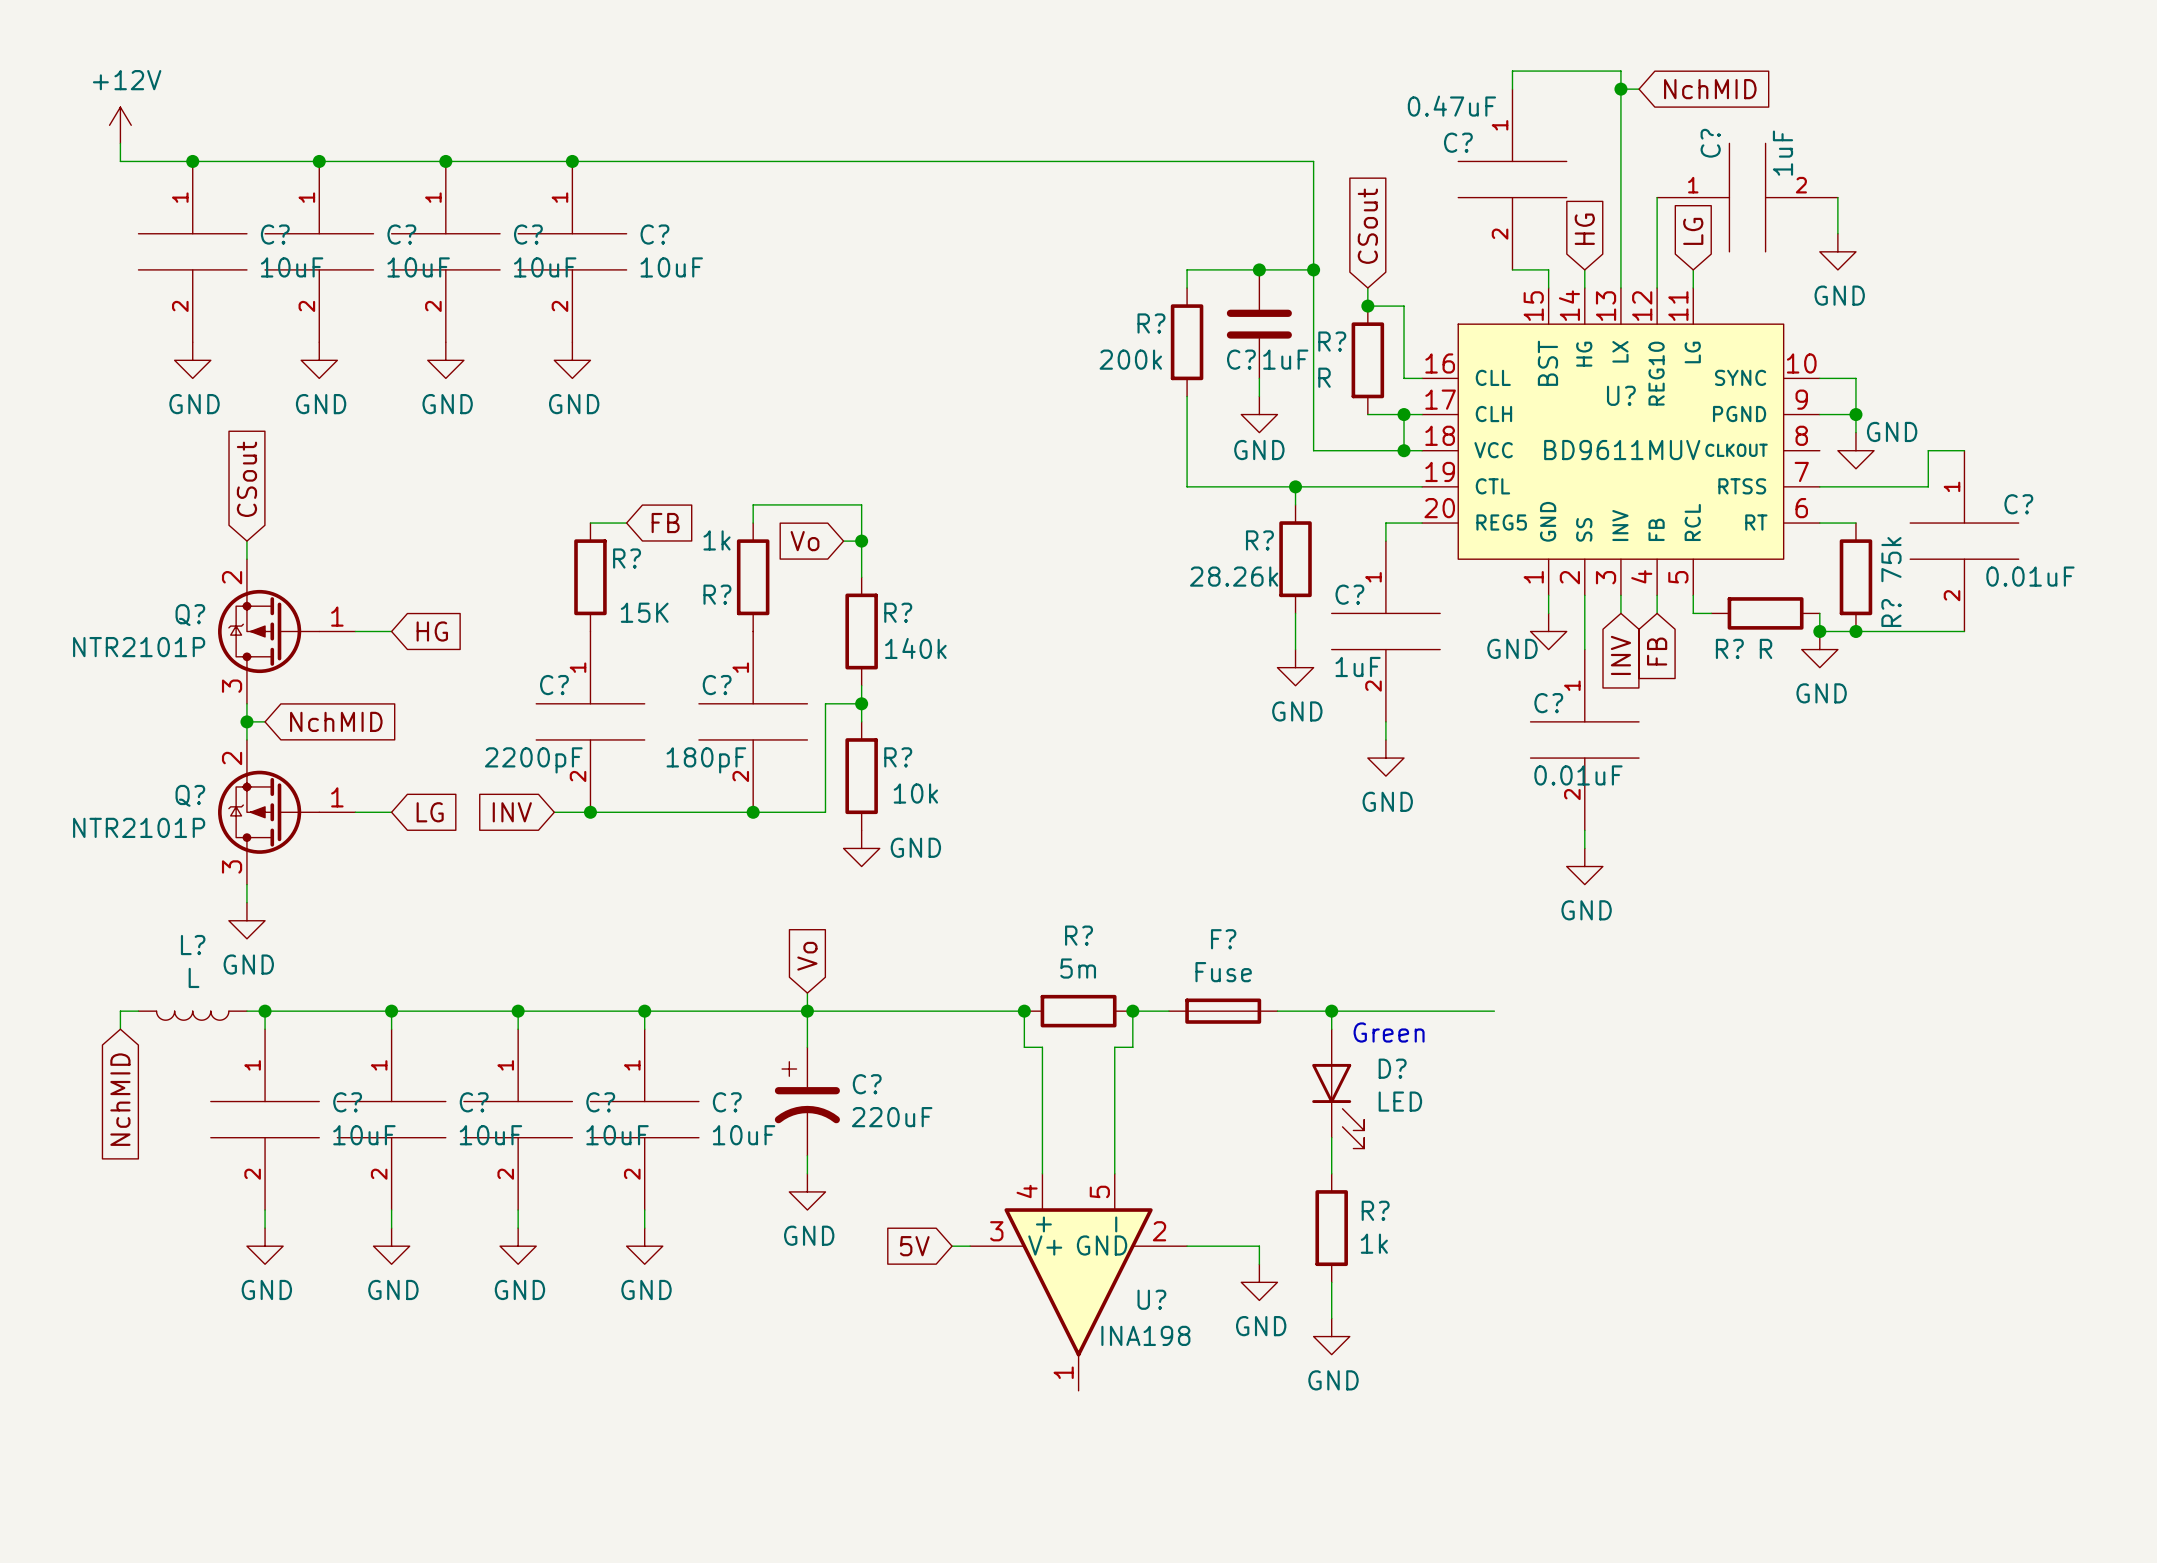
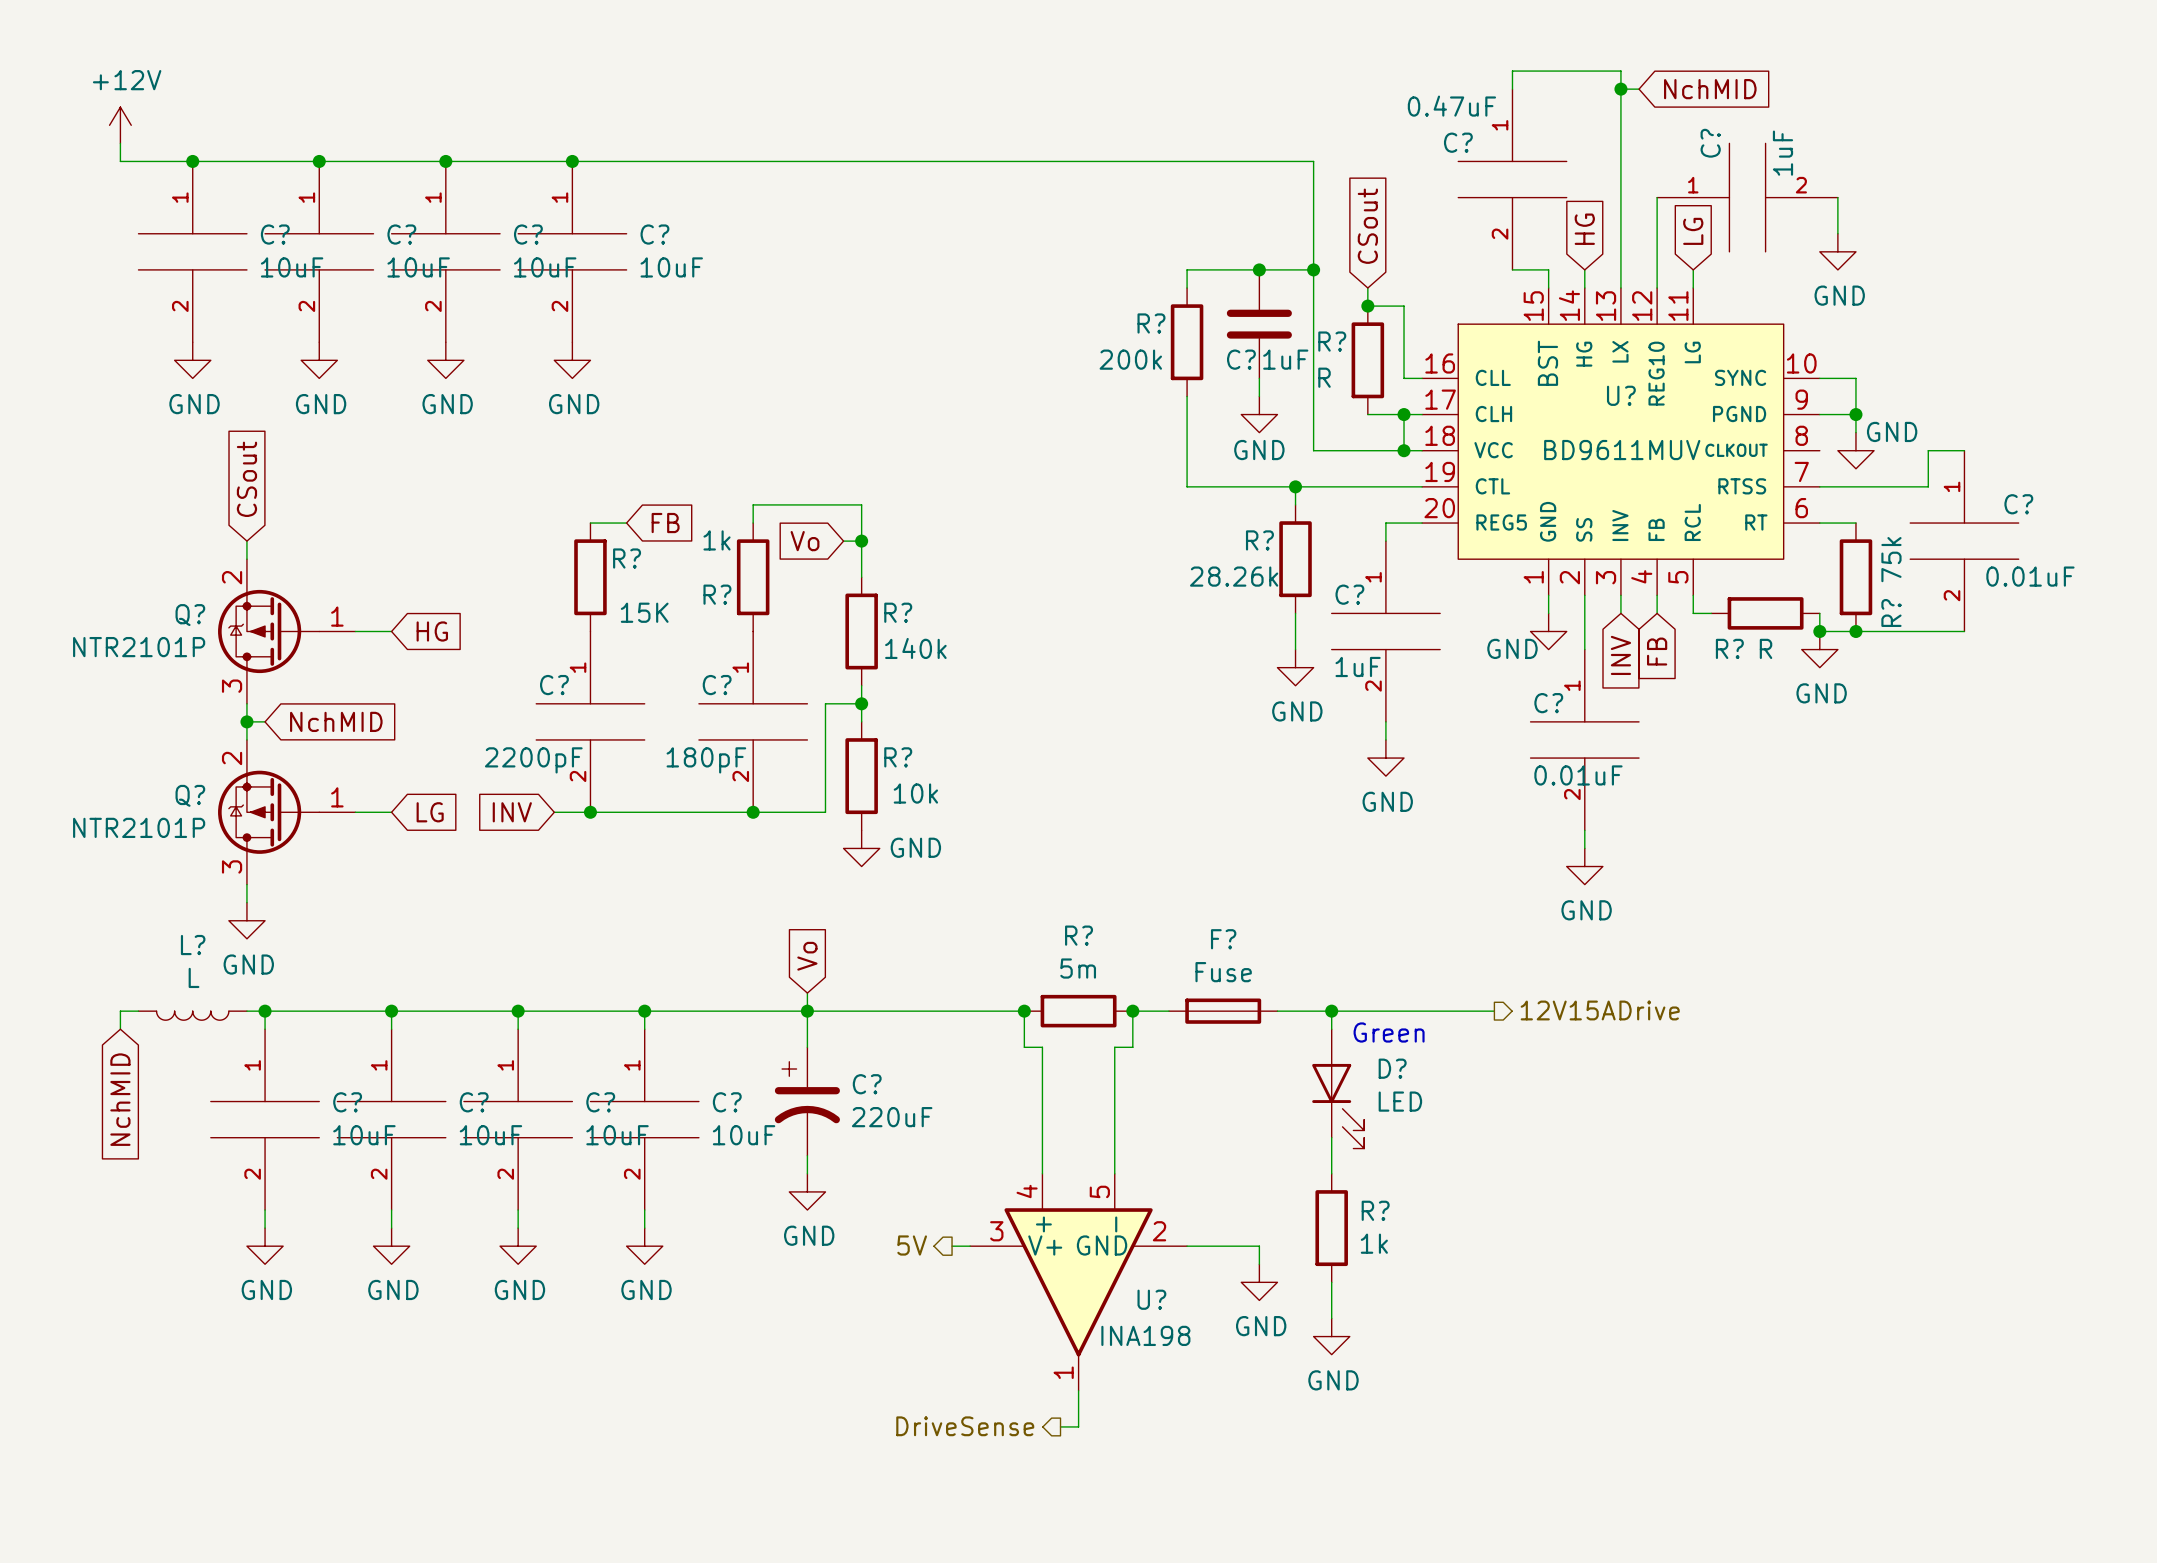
hierarchical label: none -> 12V15ADrive (1600, 1010)
hierarchical label: none -> 5V (912, 1245)
global label: 5V (914, 1246) -> none
wire: none -> (1078, 1390) (1078, 1426) (1060, 1426)
hierarchical label: none -> DriveSense (965, 1426)

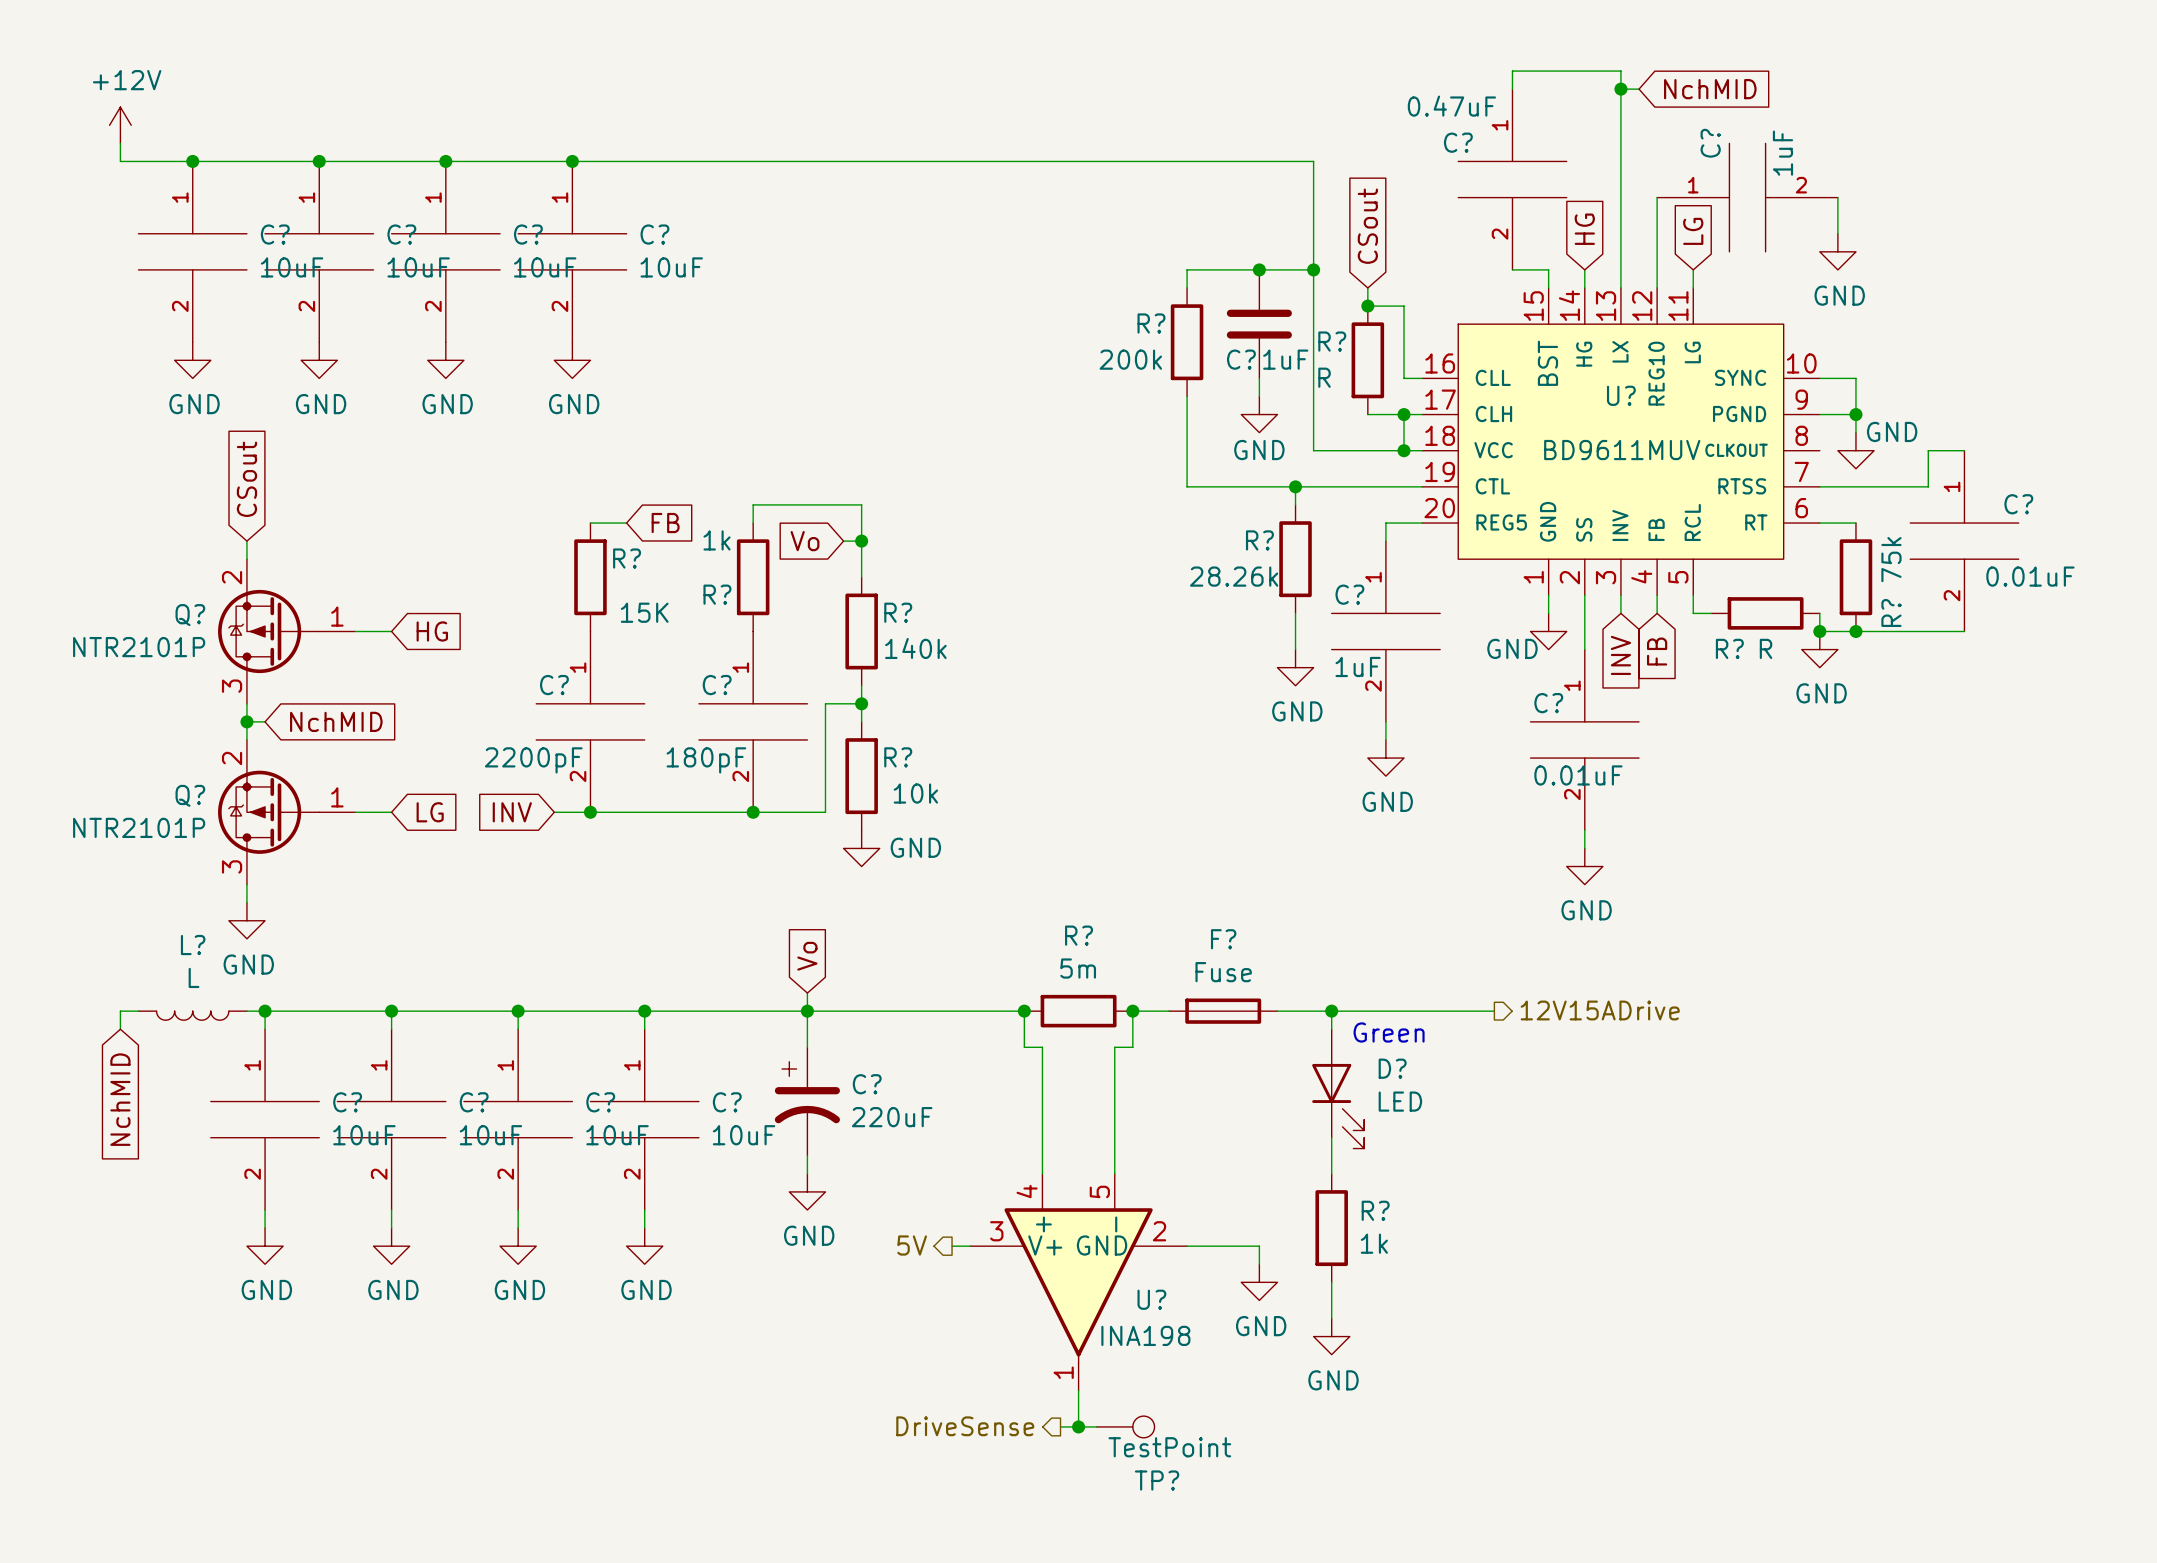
wire: none -> (1078, 1426) (1096, 1426)
junction: none -> (1078, 1426)
TP?: none -> TestPoint (1125, 1426)

